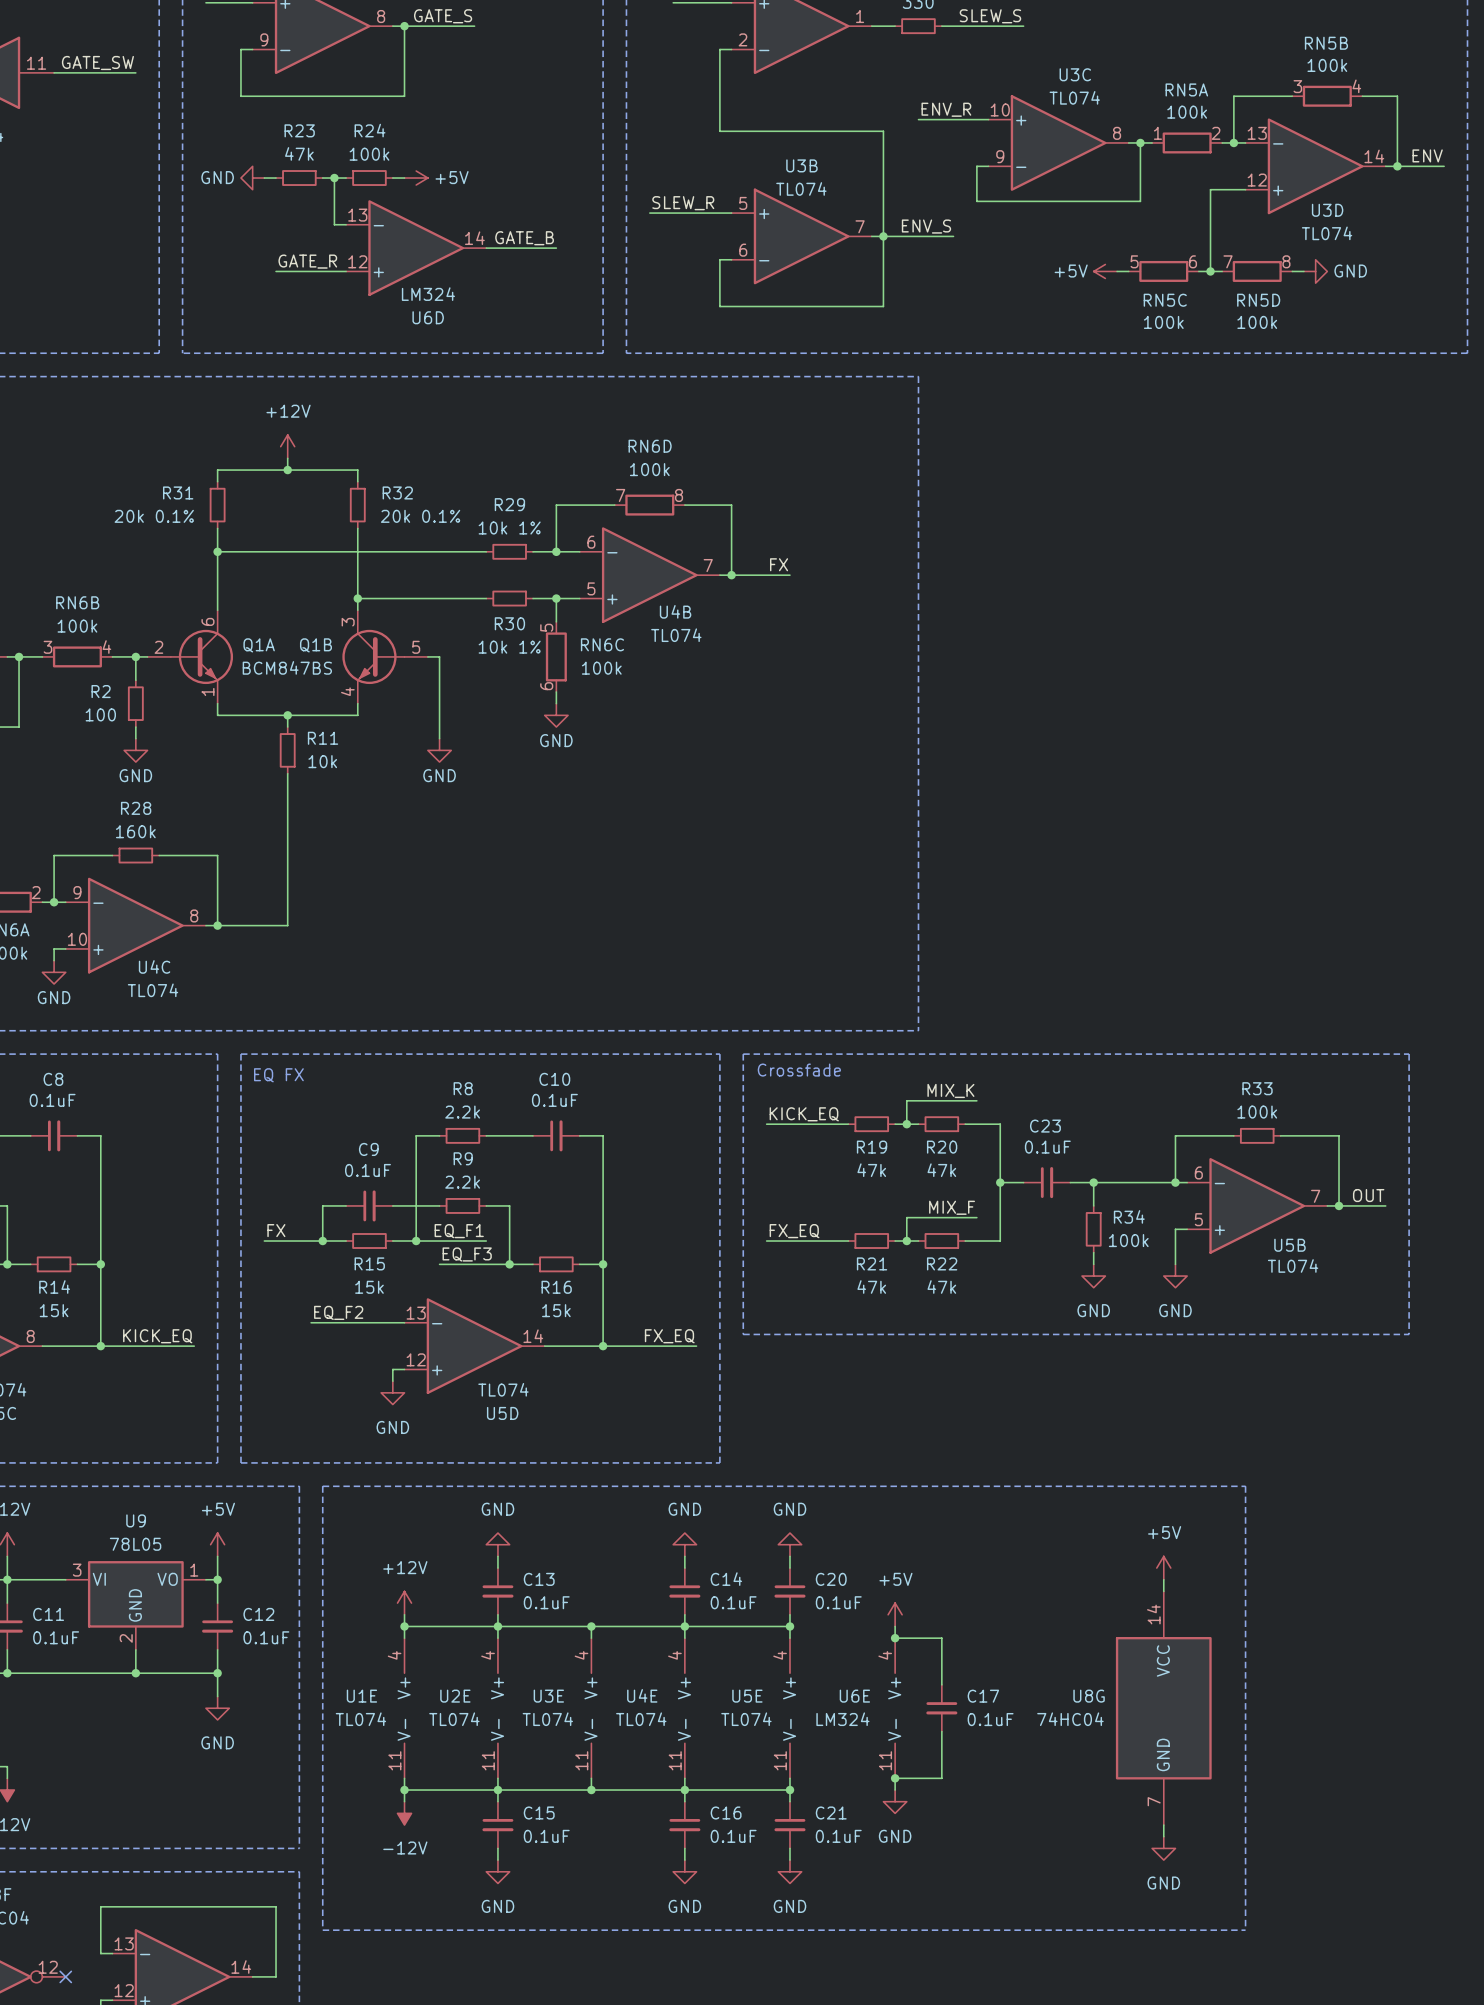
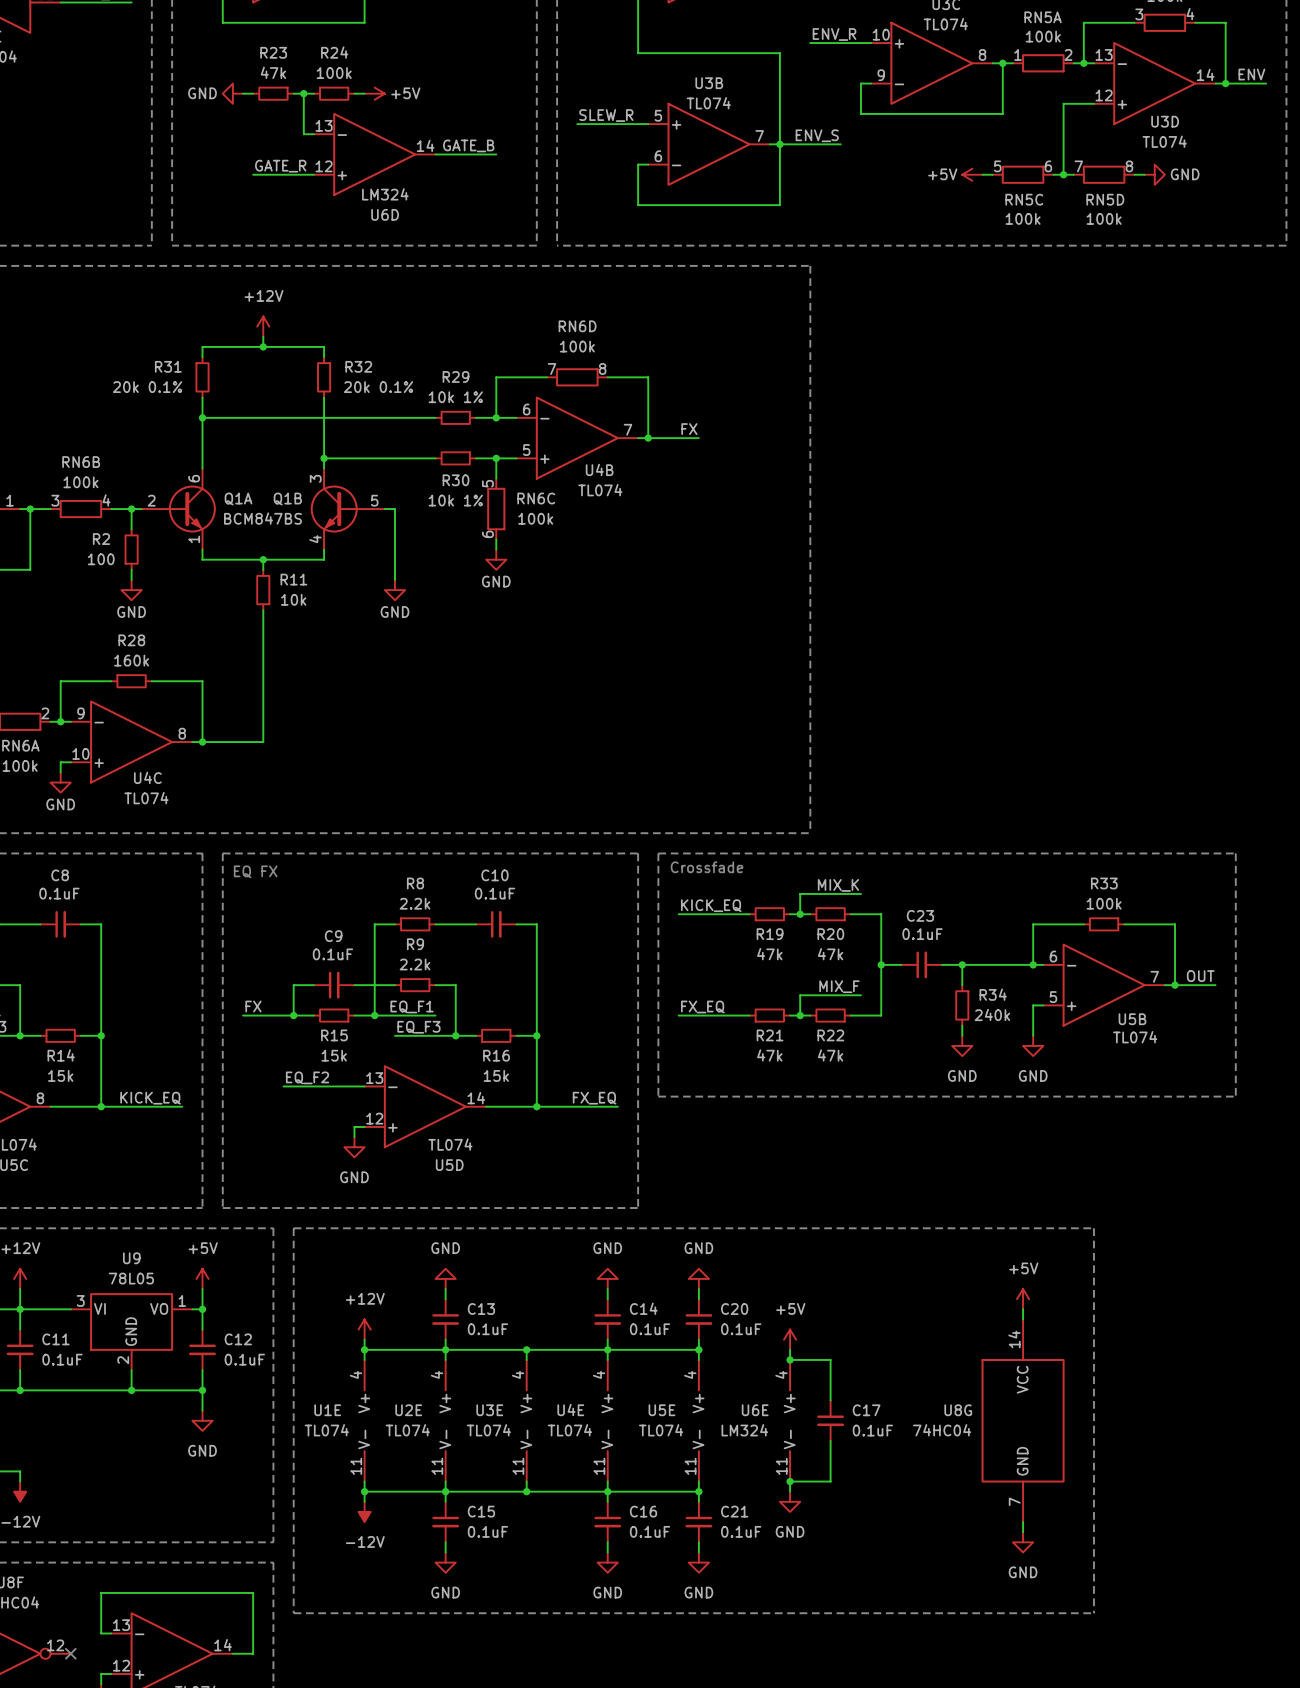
R34 value: 100k (1128, 1240) -> 240k (992, 1014)

